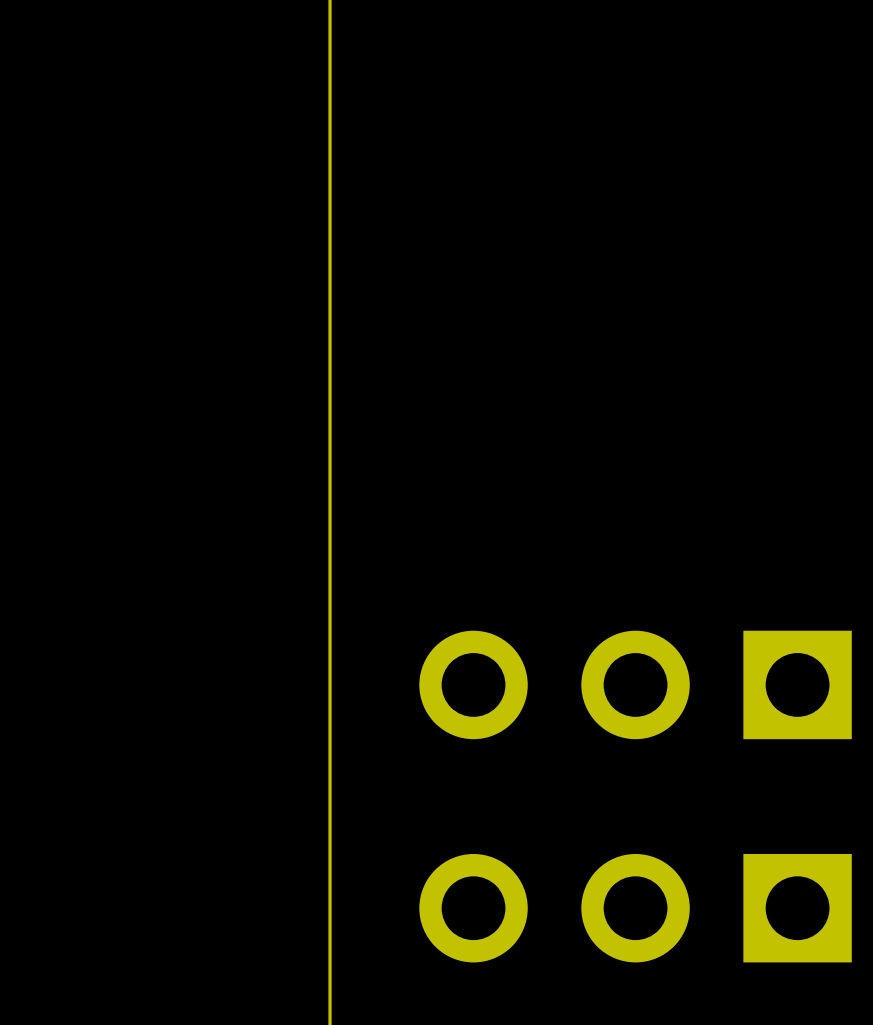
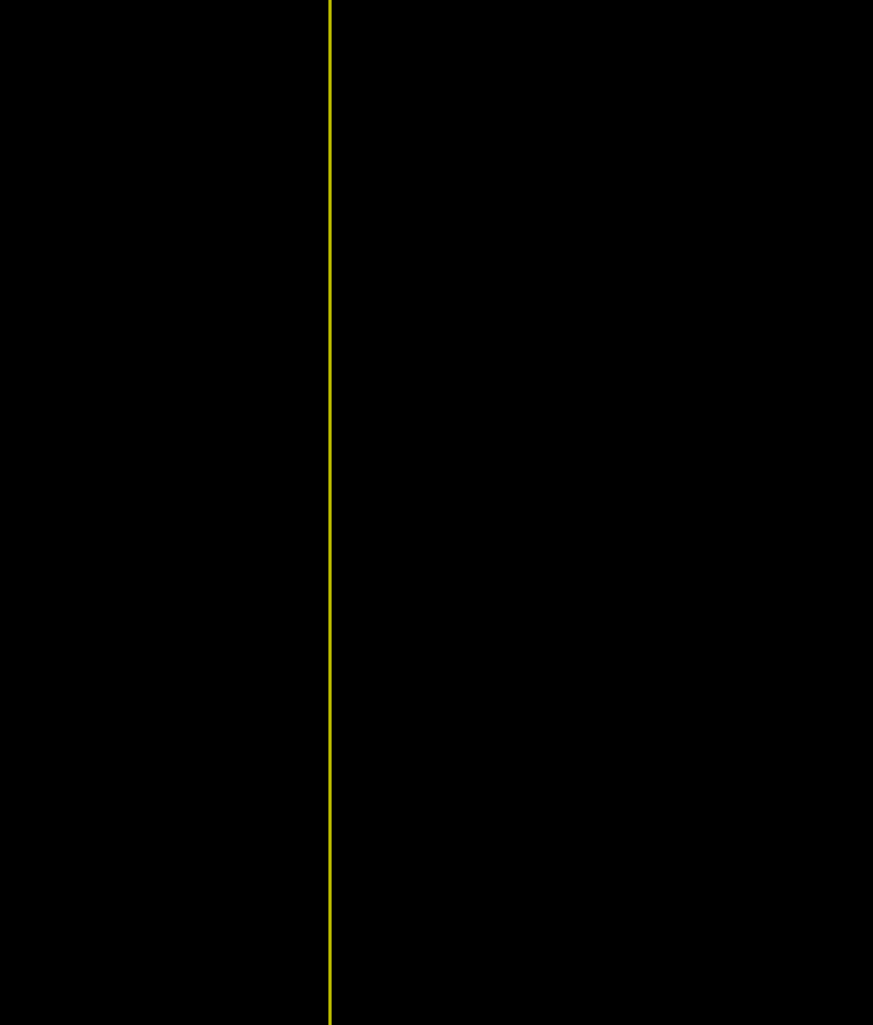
part: (635, 684) -> none
part: (635, 908) -> none

